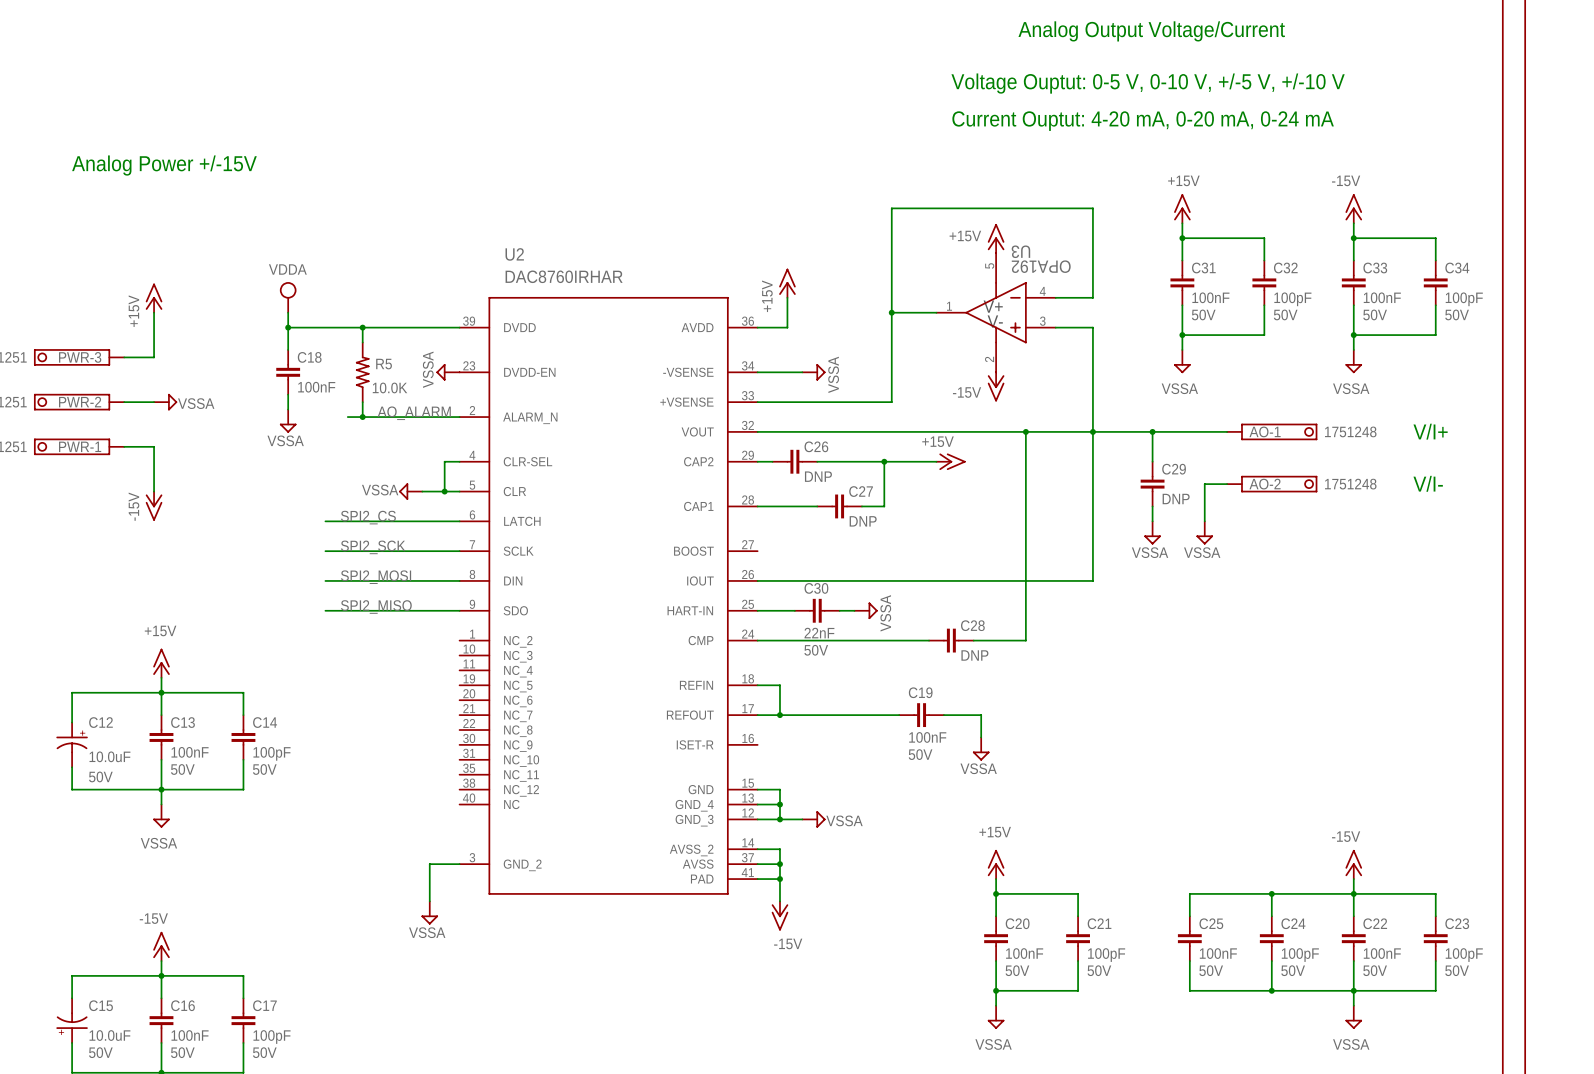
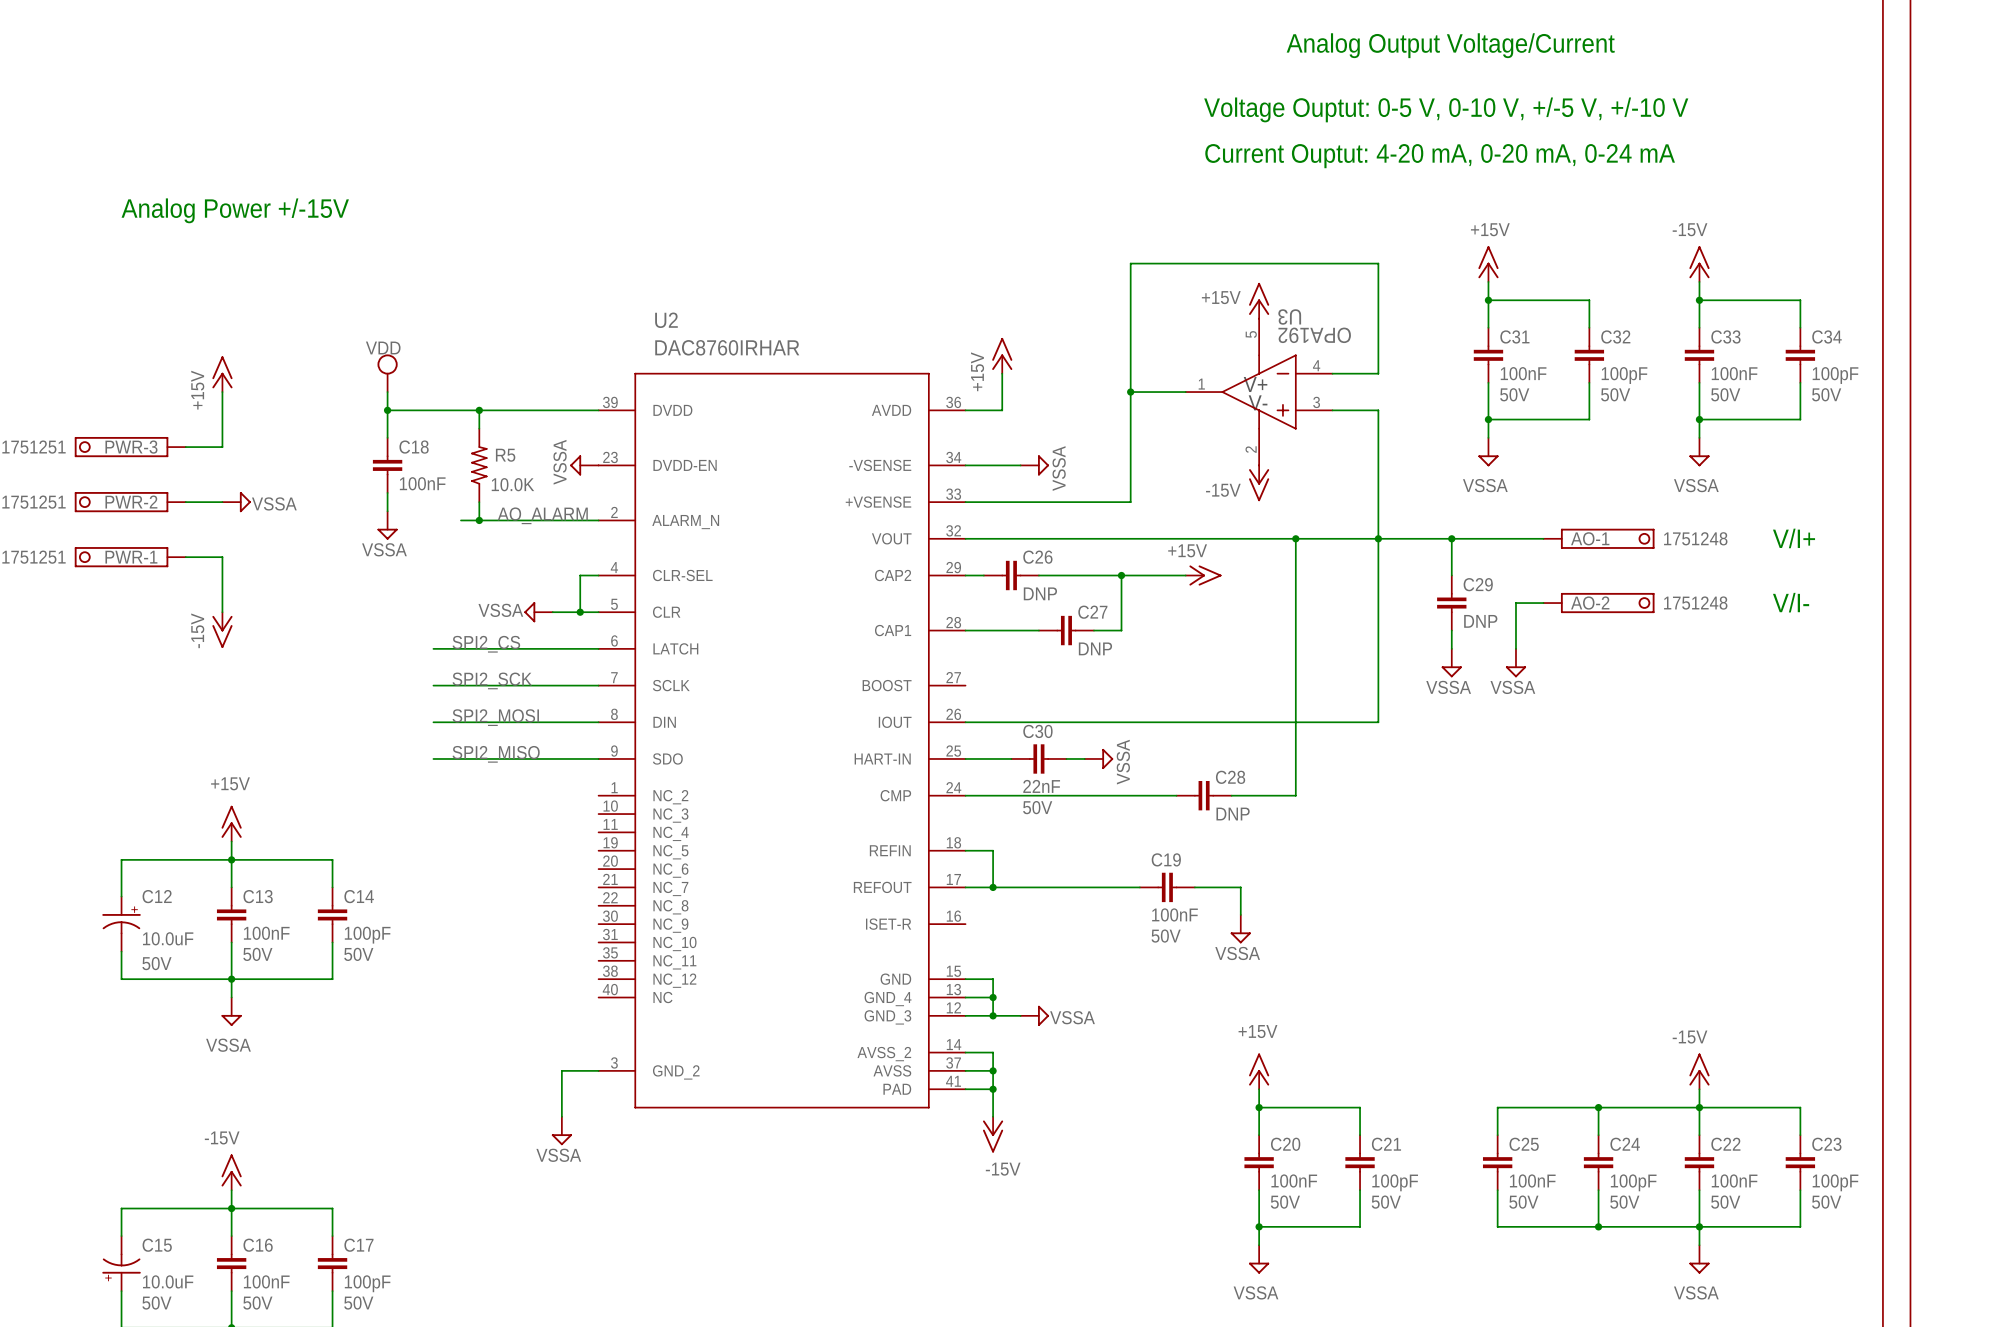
power symbol: VDDA (288, 297) -> VDD (387, 373)

